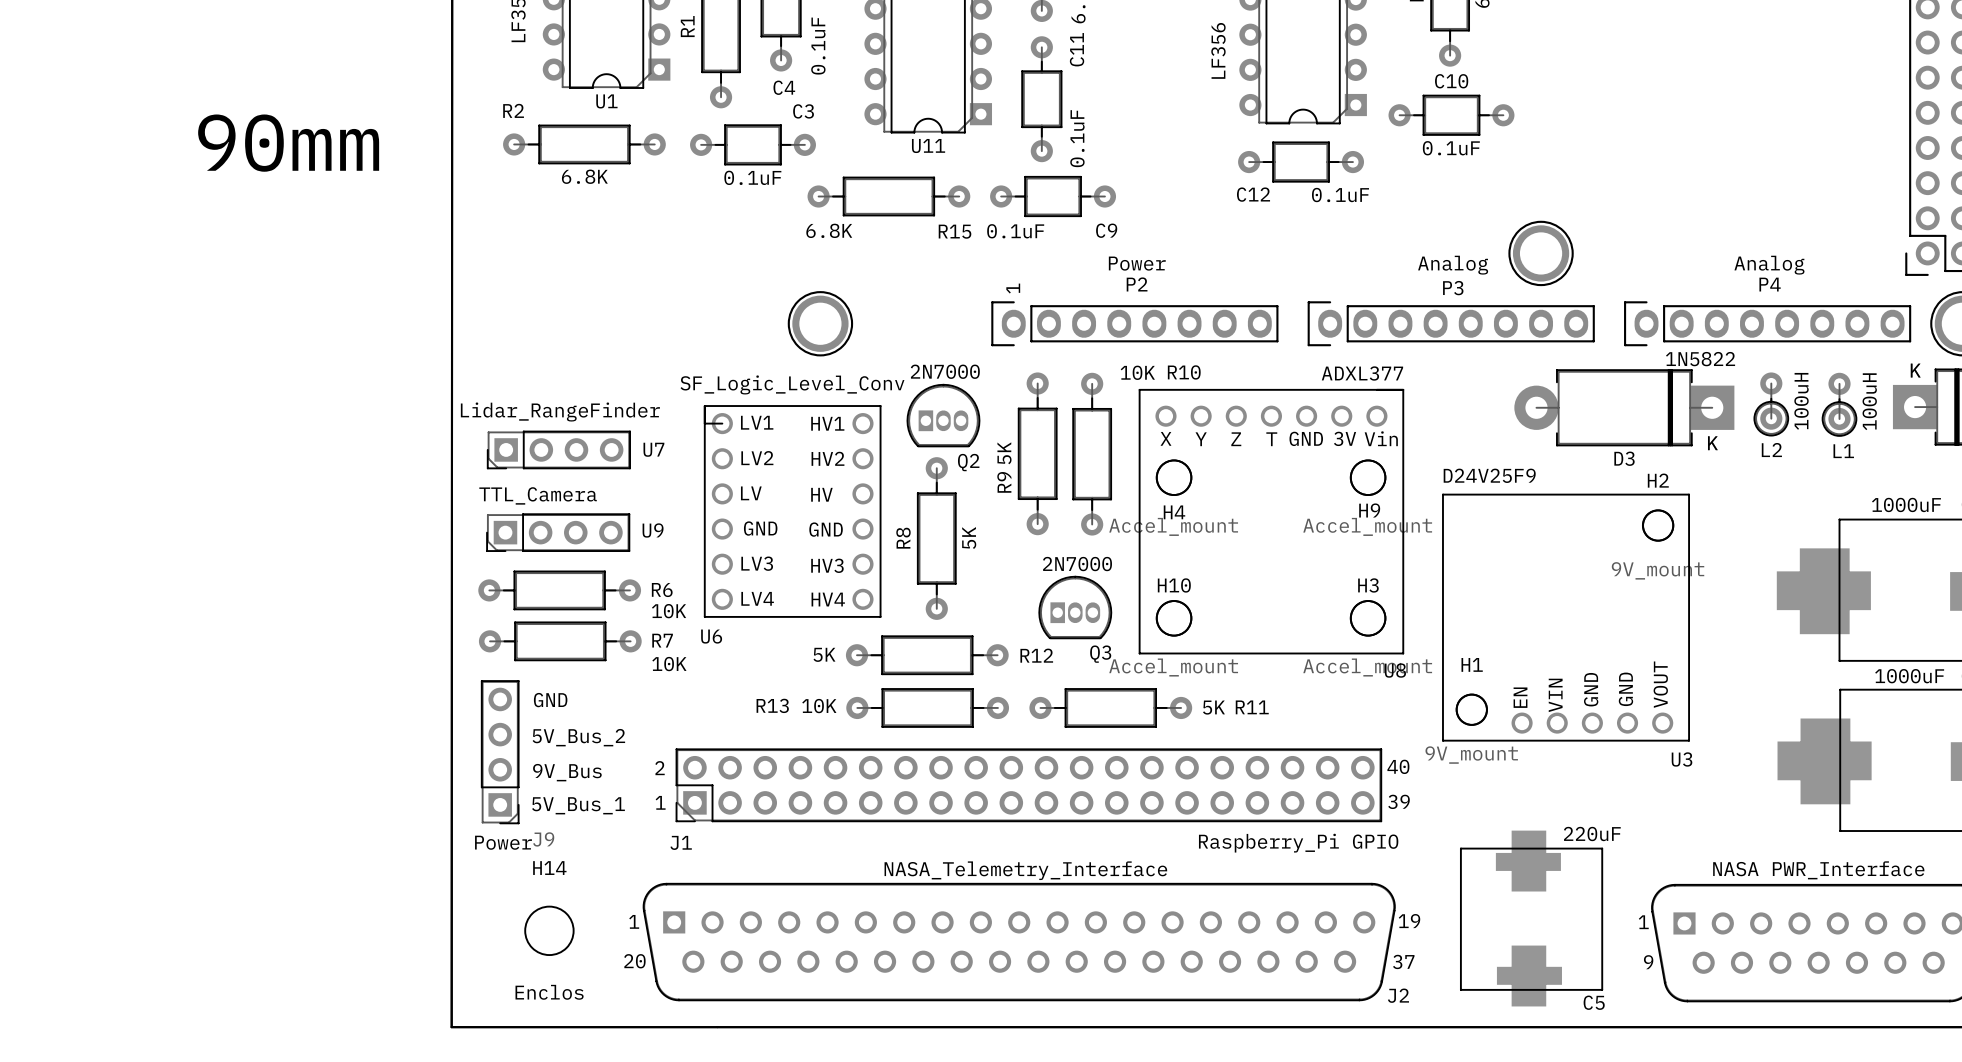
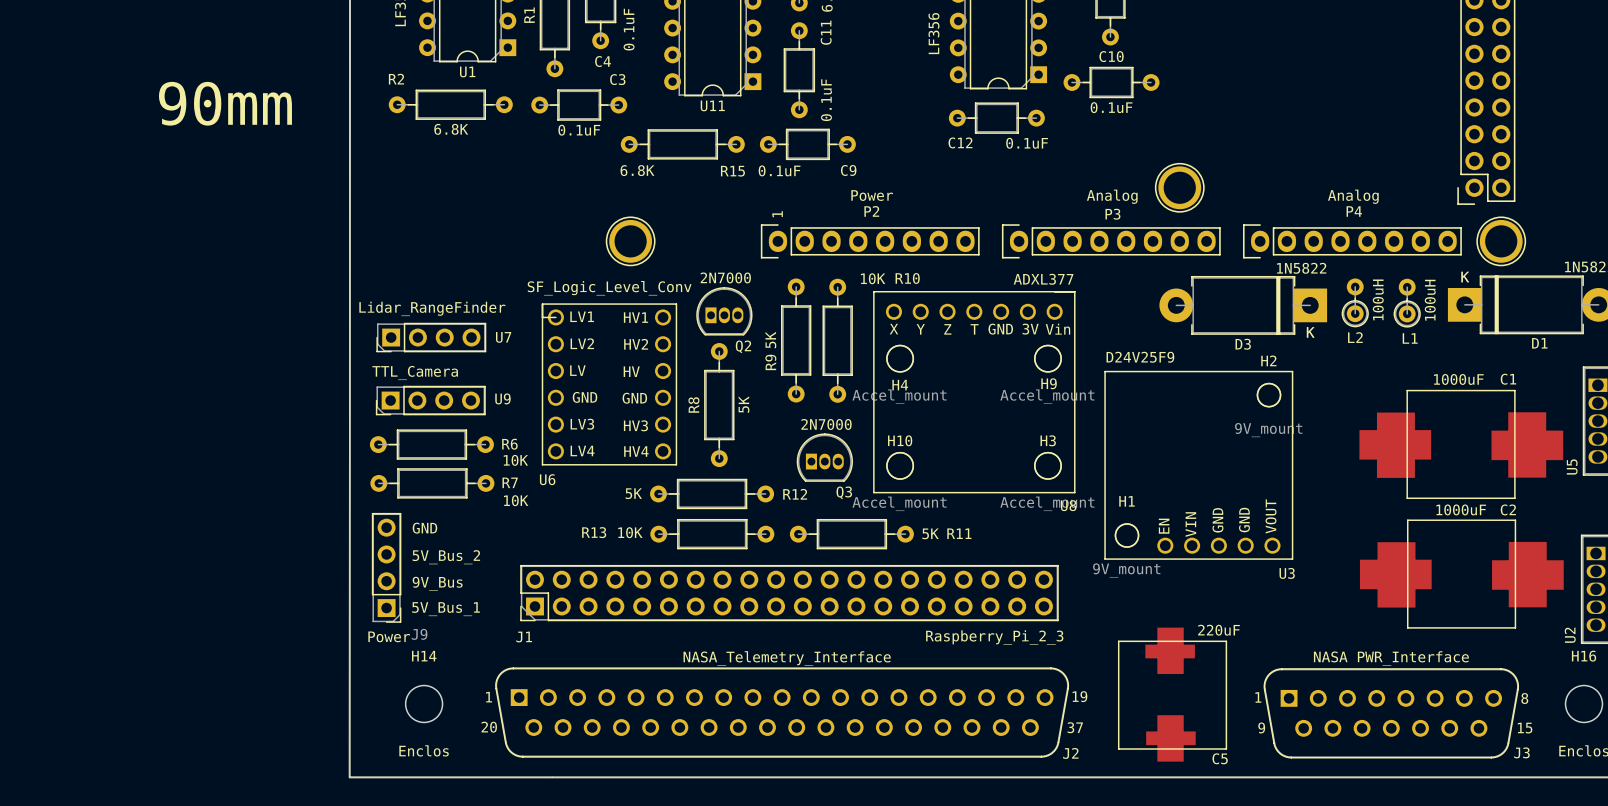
text: 40 (1398, 766) -> none
text: 2 (660, 768) -> none
text: 39 (1399, 801) -> none
text: 1 (660, 802) -> none
J1 value: Raspberry_Pi GPIO (1298, 843) -> Raspberry_Pi_2_3 (994, 637)

